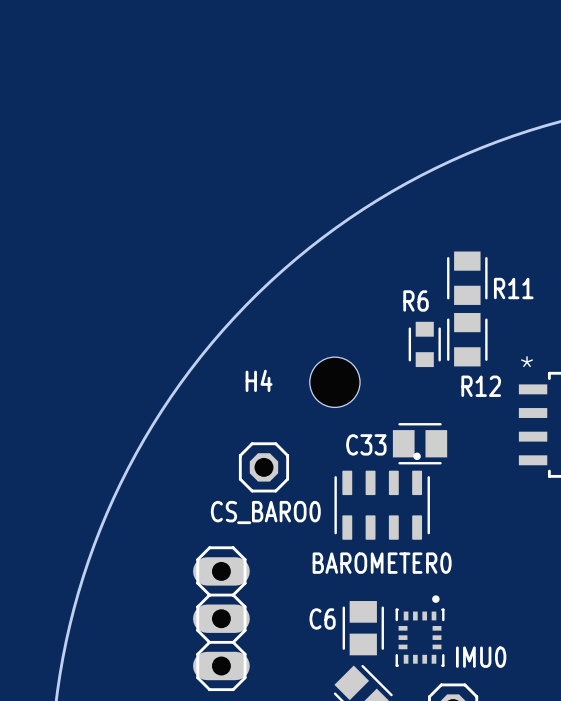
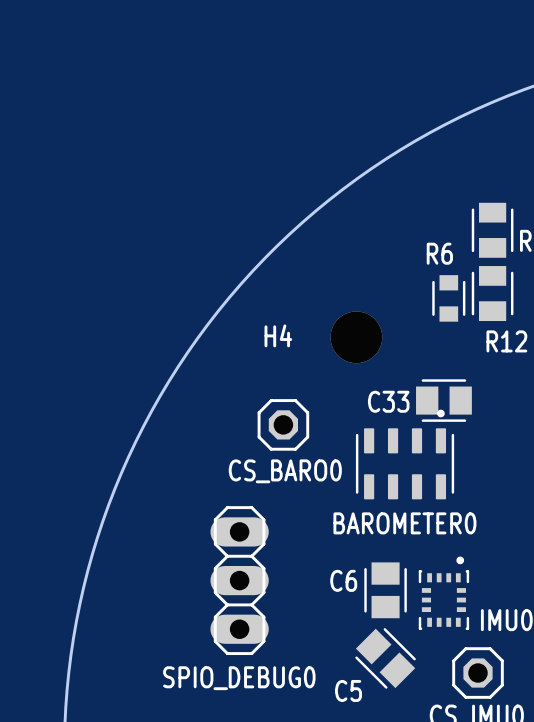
H4 footprint: [309, 357, 361, 408] -> [330, 311, 383, 364]

